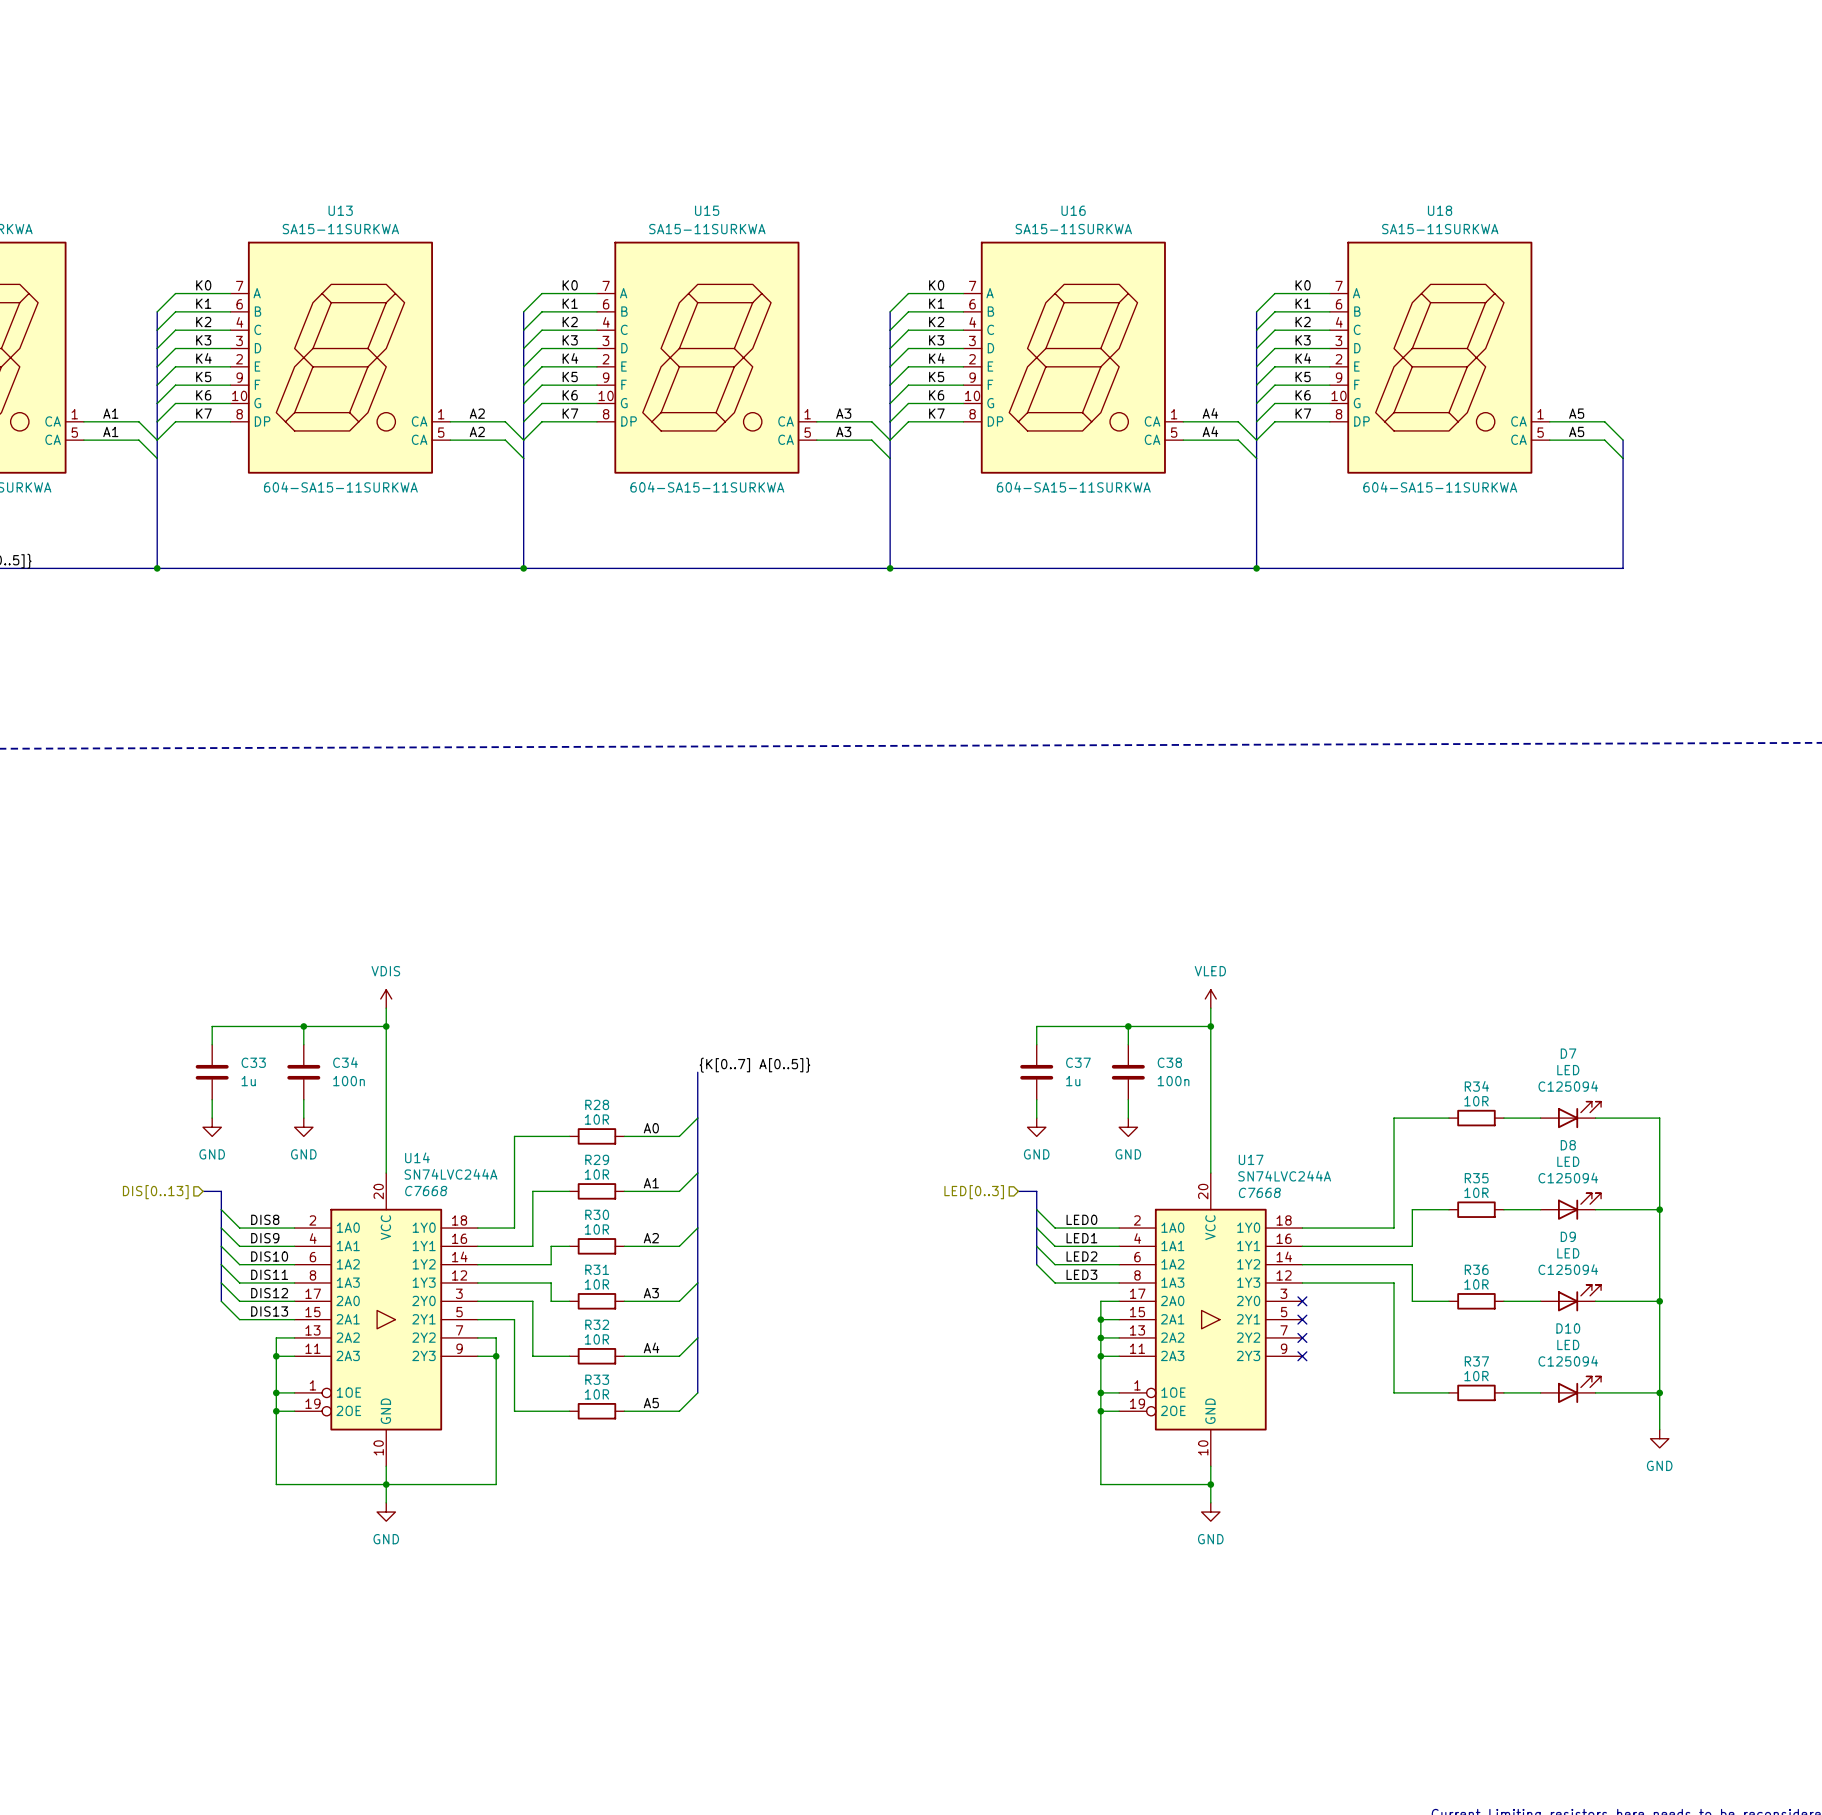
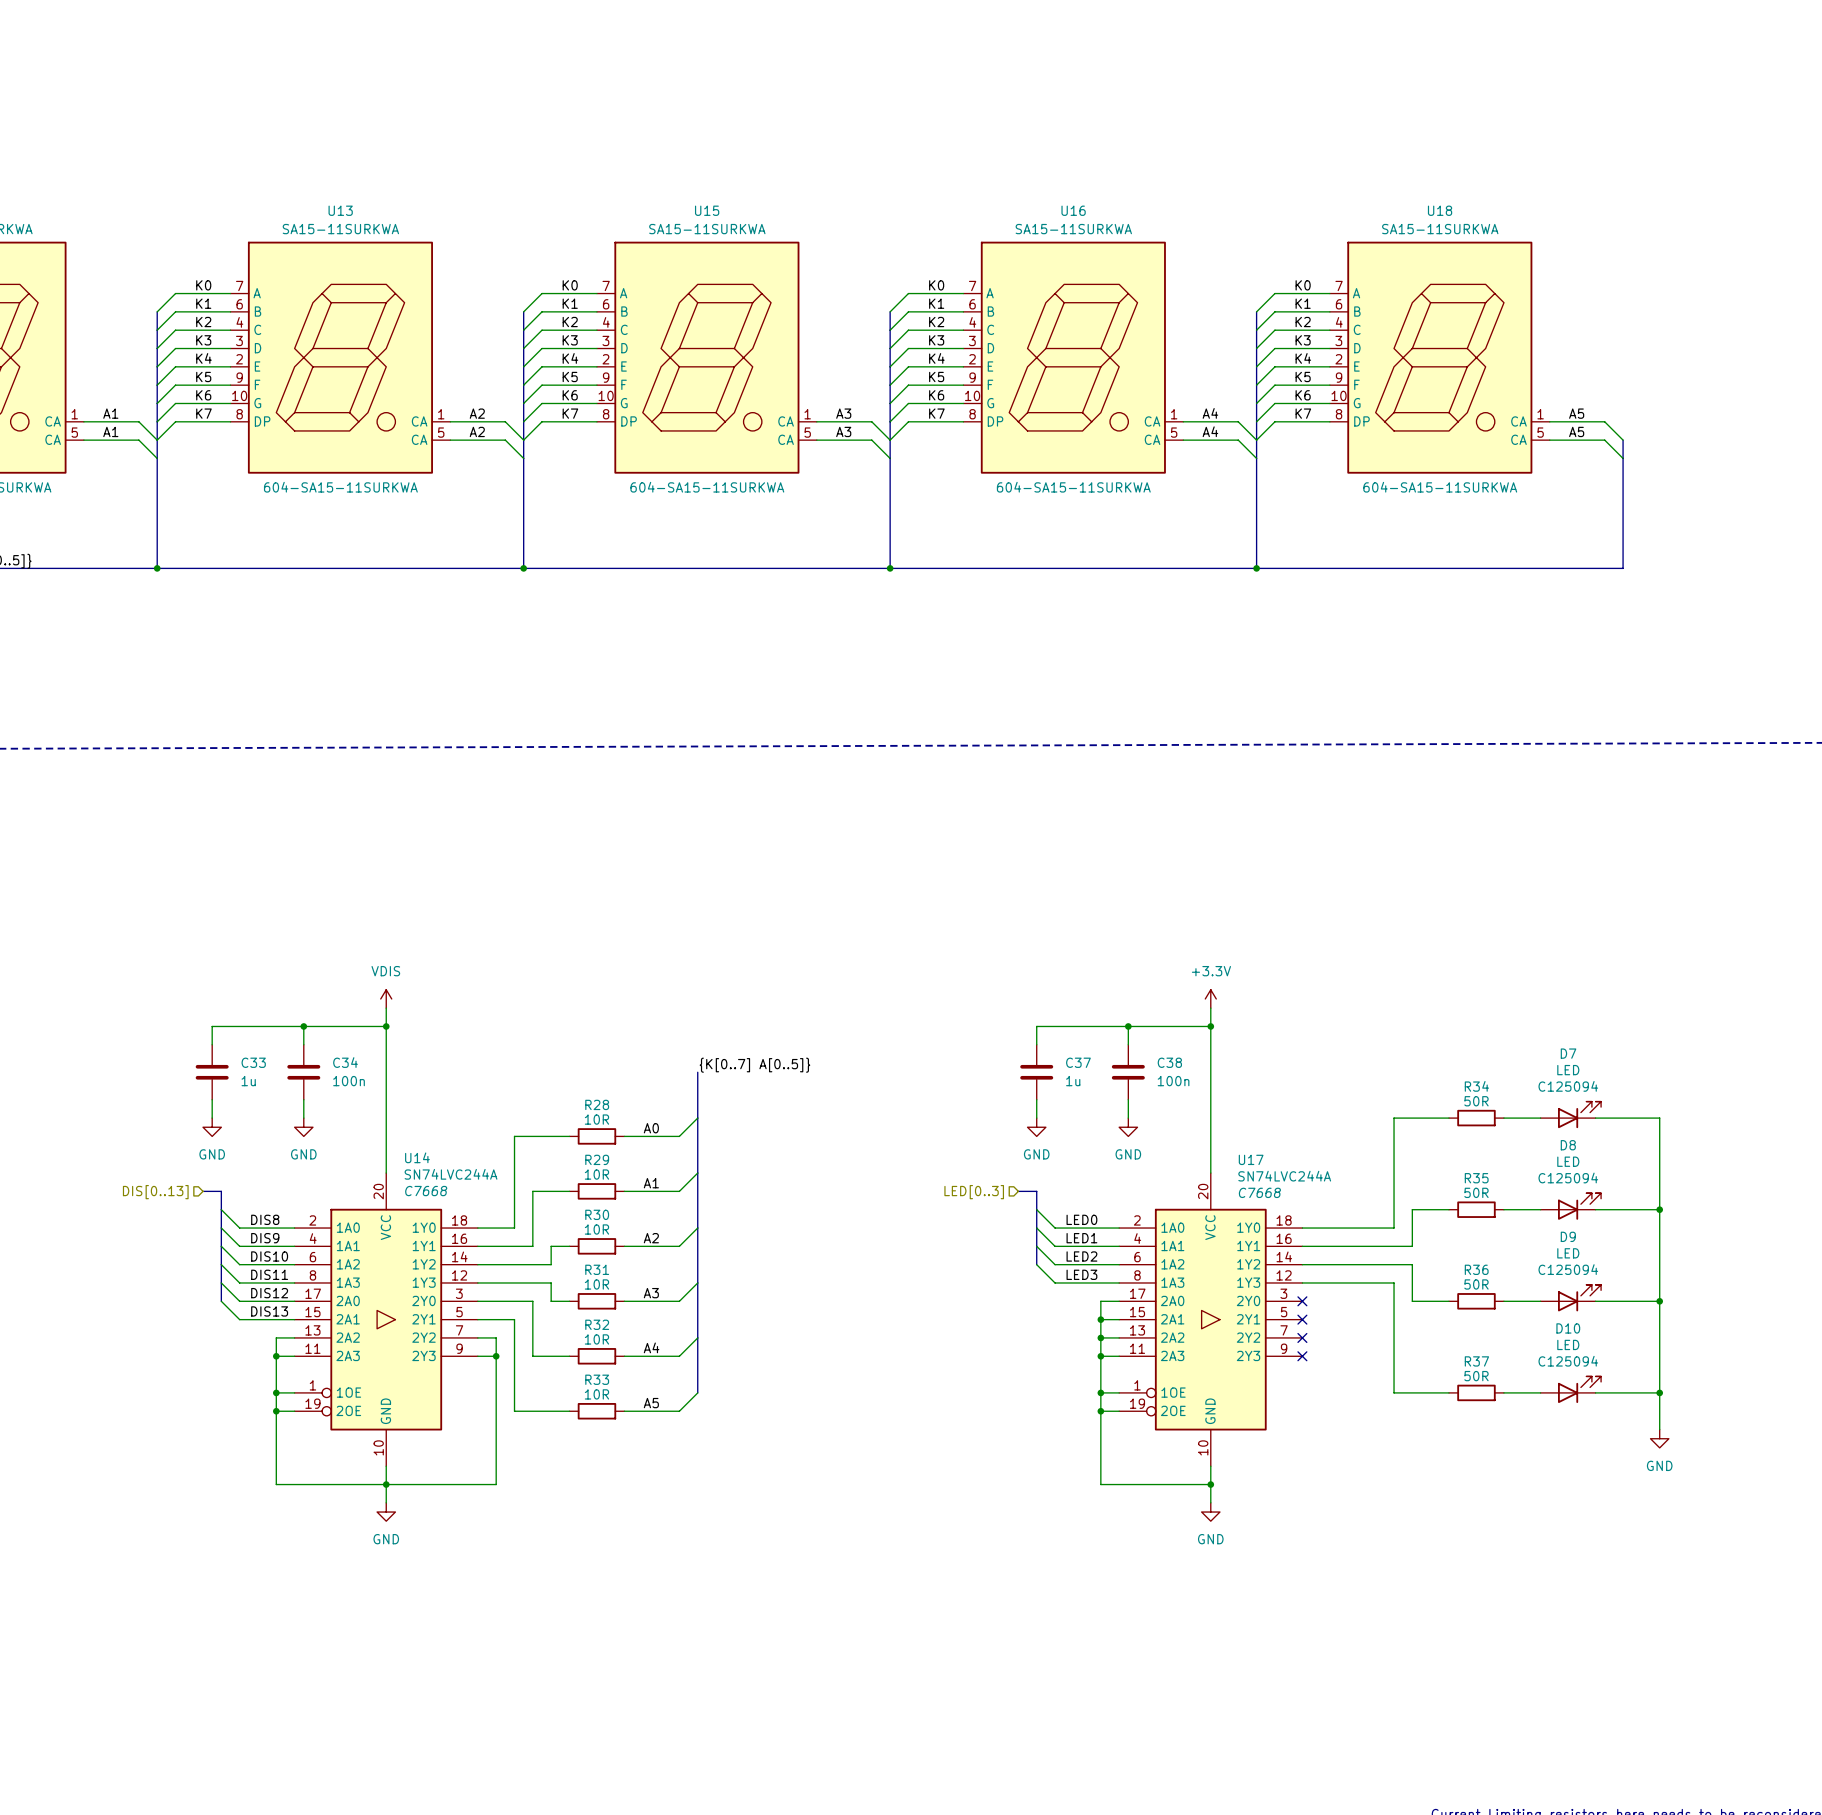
power symbol: VLED (1210, 998) -> +3.3V (1210, 998)
R34 value: 10R (1476, 1101) -> 50R (1476, 1101)
R35 value: 10R (1476, 1192) -> 50R (1476, 1192)
R36 value: 10R (1476, 1284) -> 50R (1476, 1284)
R37 value: 10R (1476, 1376) -> 50R (1476, 1376)

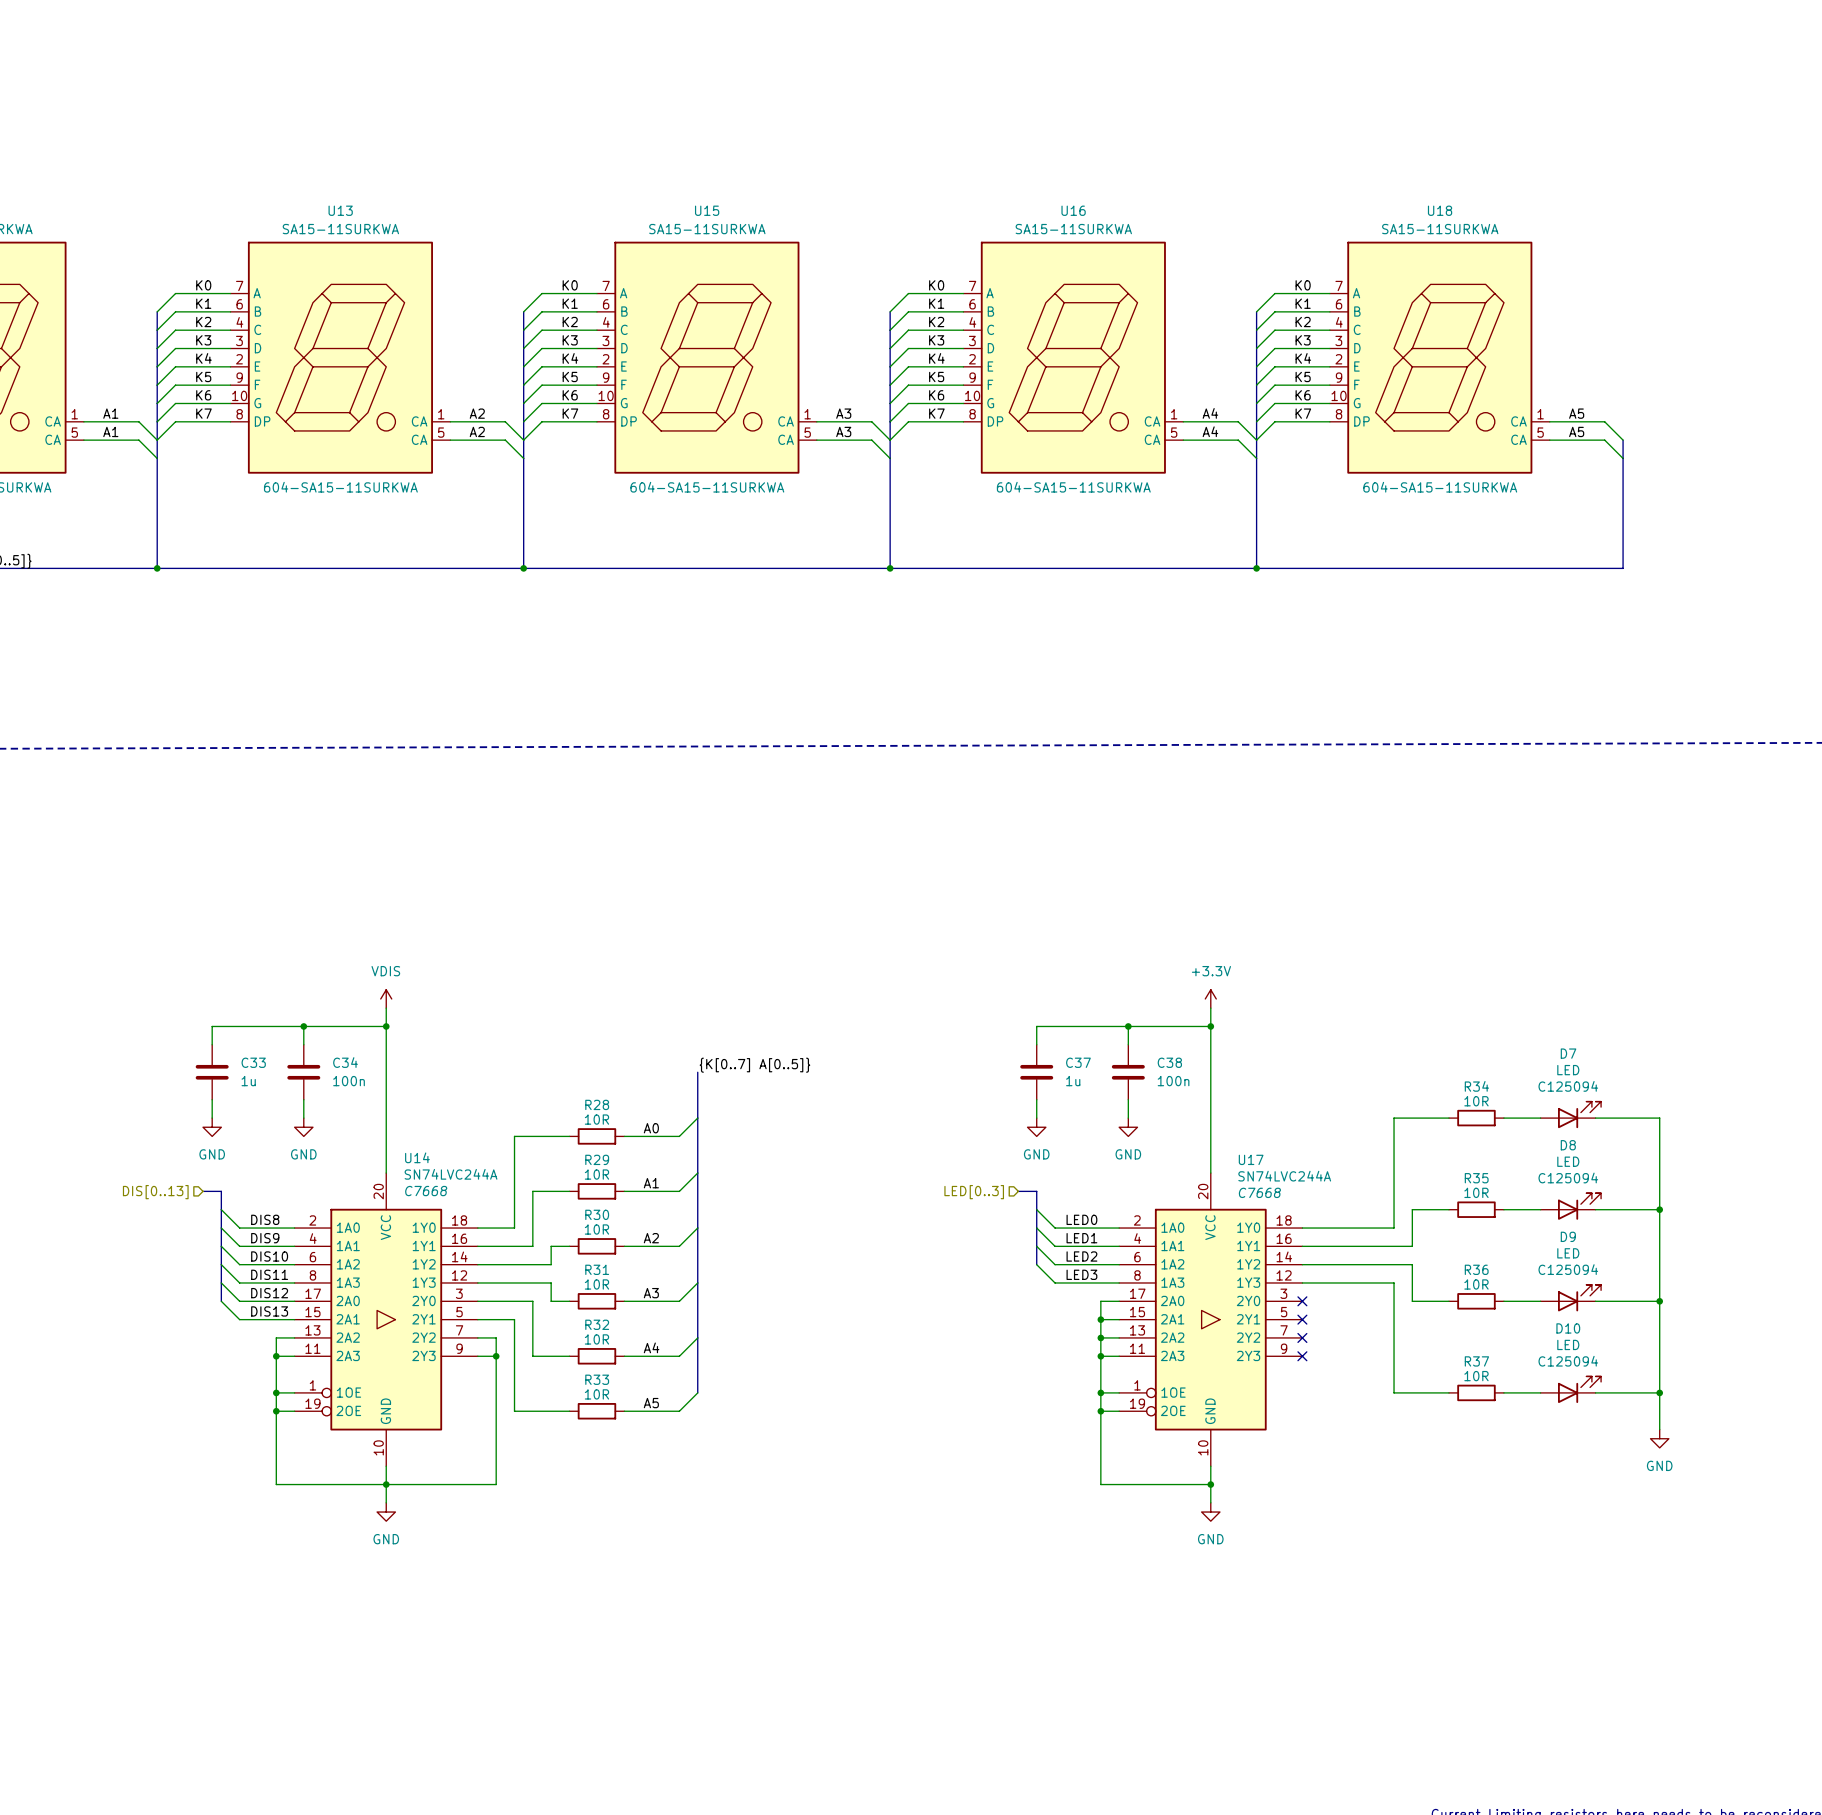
R34 value: 50R (1476, 1101) -> 10R (1476, 1101)
R35 value: 50R (1476, 1192) -> 10R (1476, 1192)
R36 value: 50R (1476, 1284) -> 10R (1476, 1284)
R37 value: 50R (1476, 1376) -> 10R (1476, 1376)

